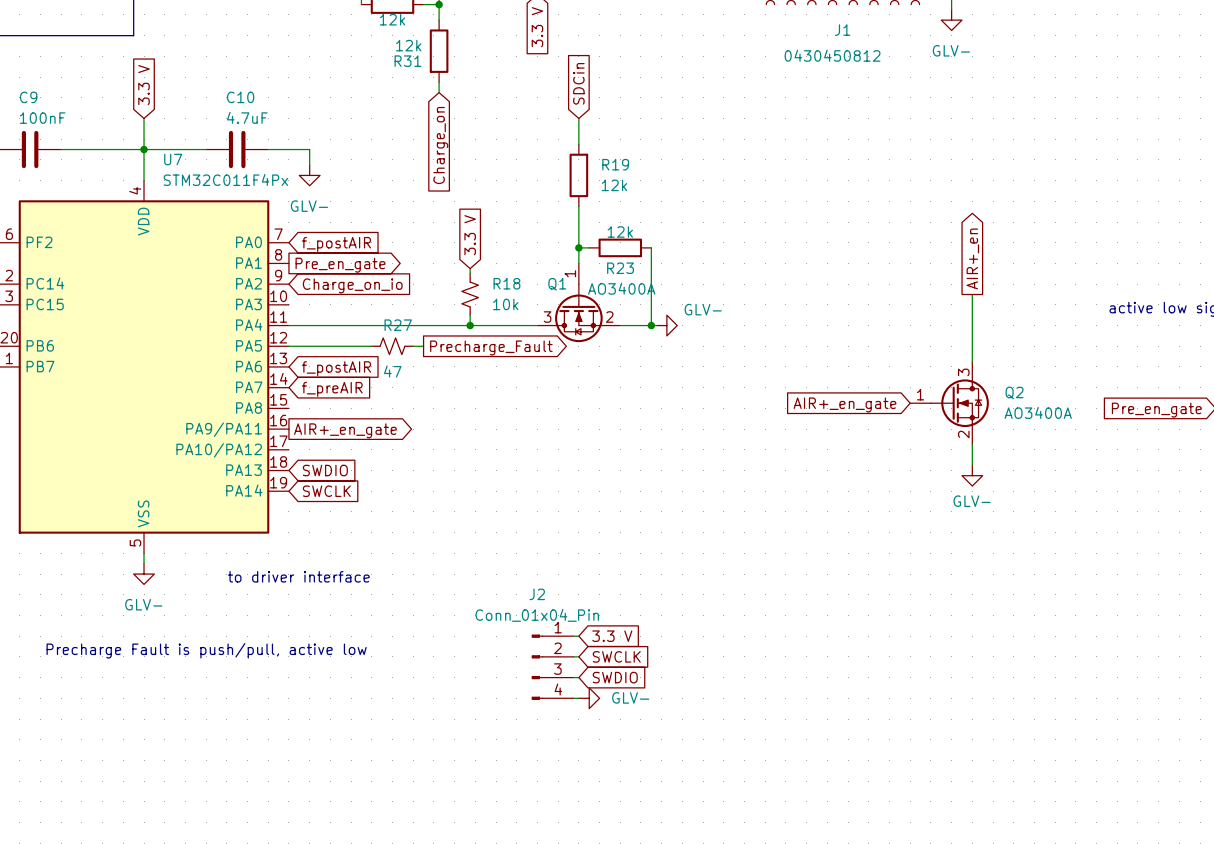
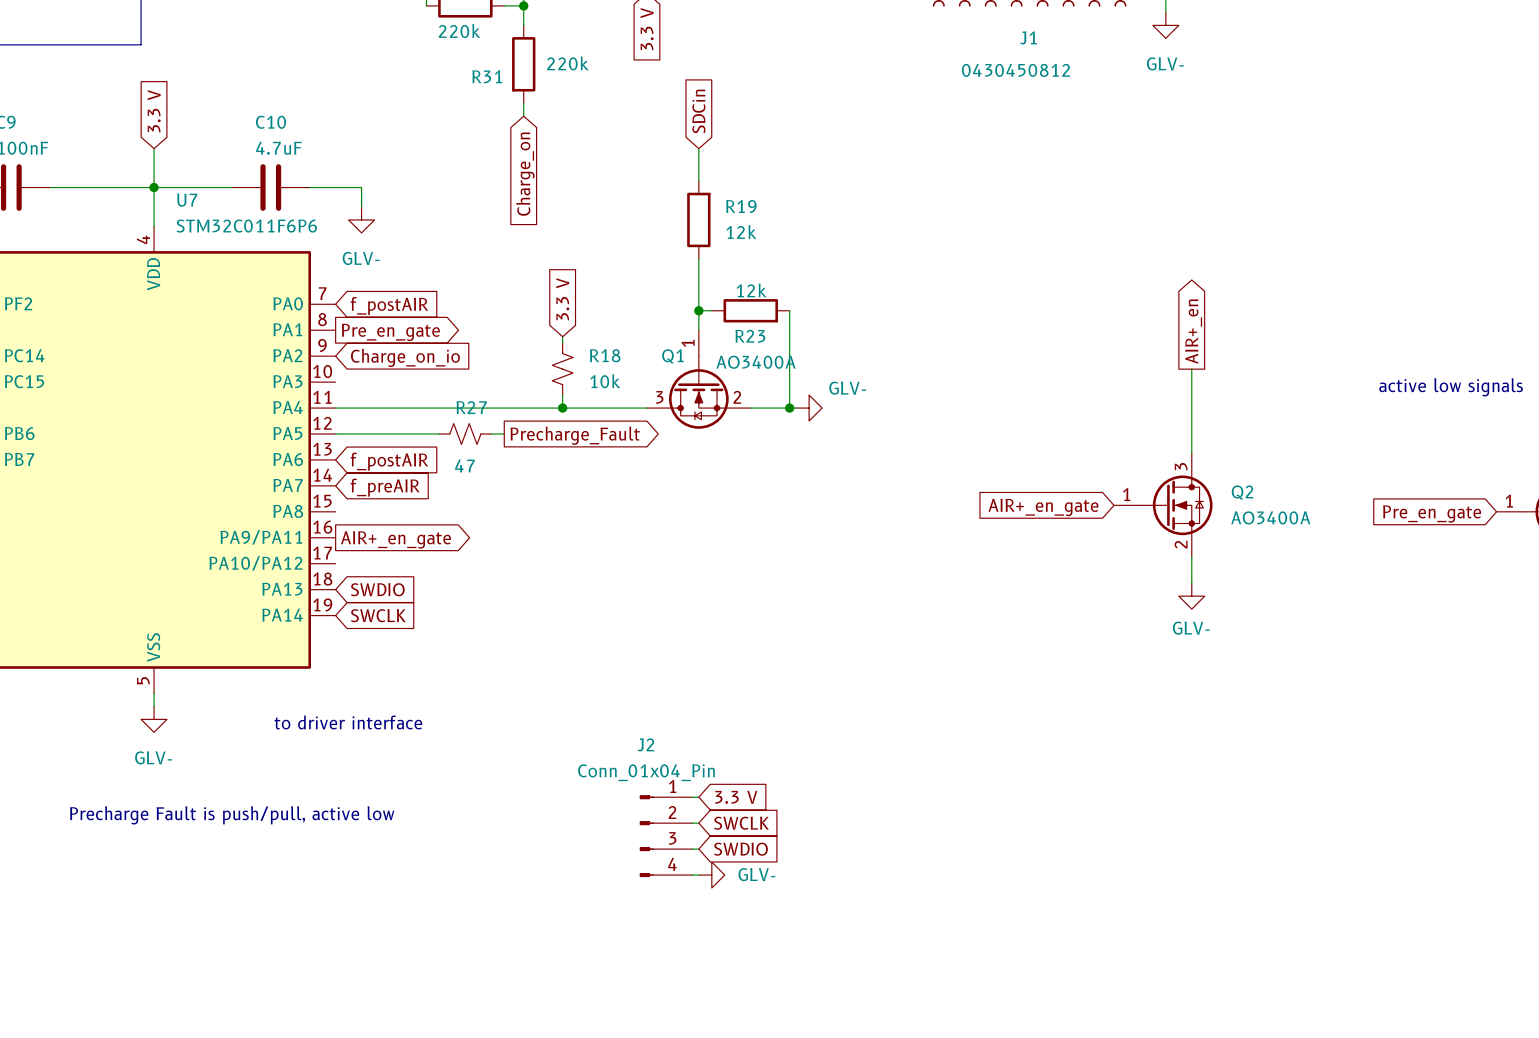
part value: 12k (392, 19) -> 220k (459, 31)
R31 value: 12k (408, 45) -> 220k (567, 63)
U7 value: STM32C011F4Px (225, 179) -> STM32C011F6P6 (246, 226)

